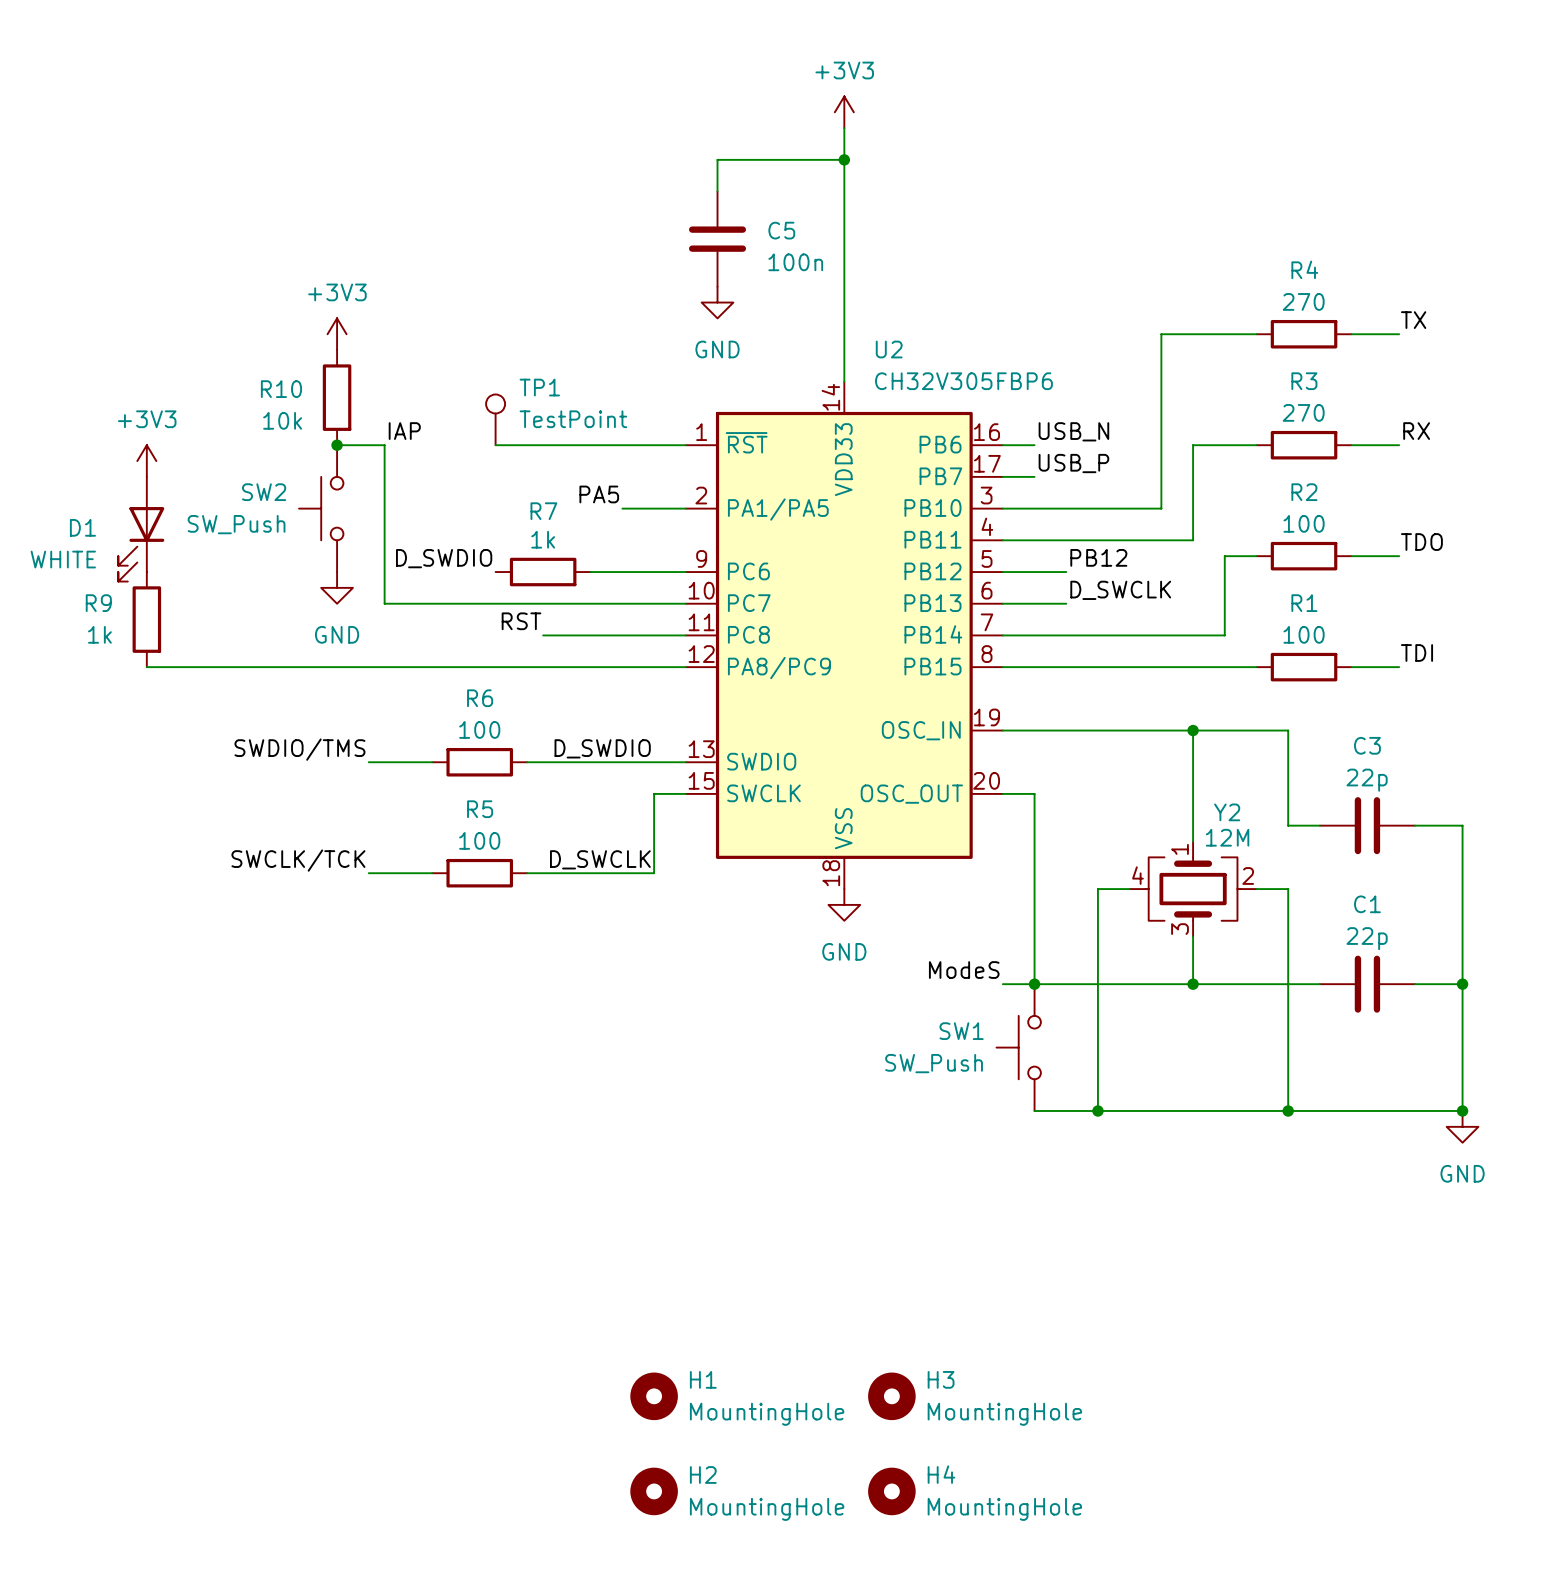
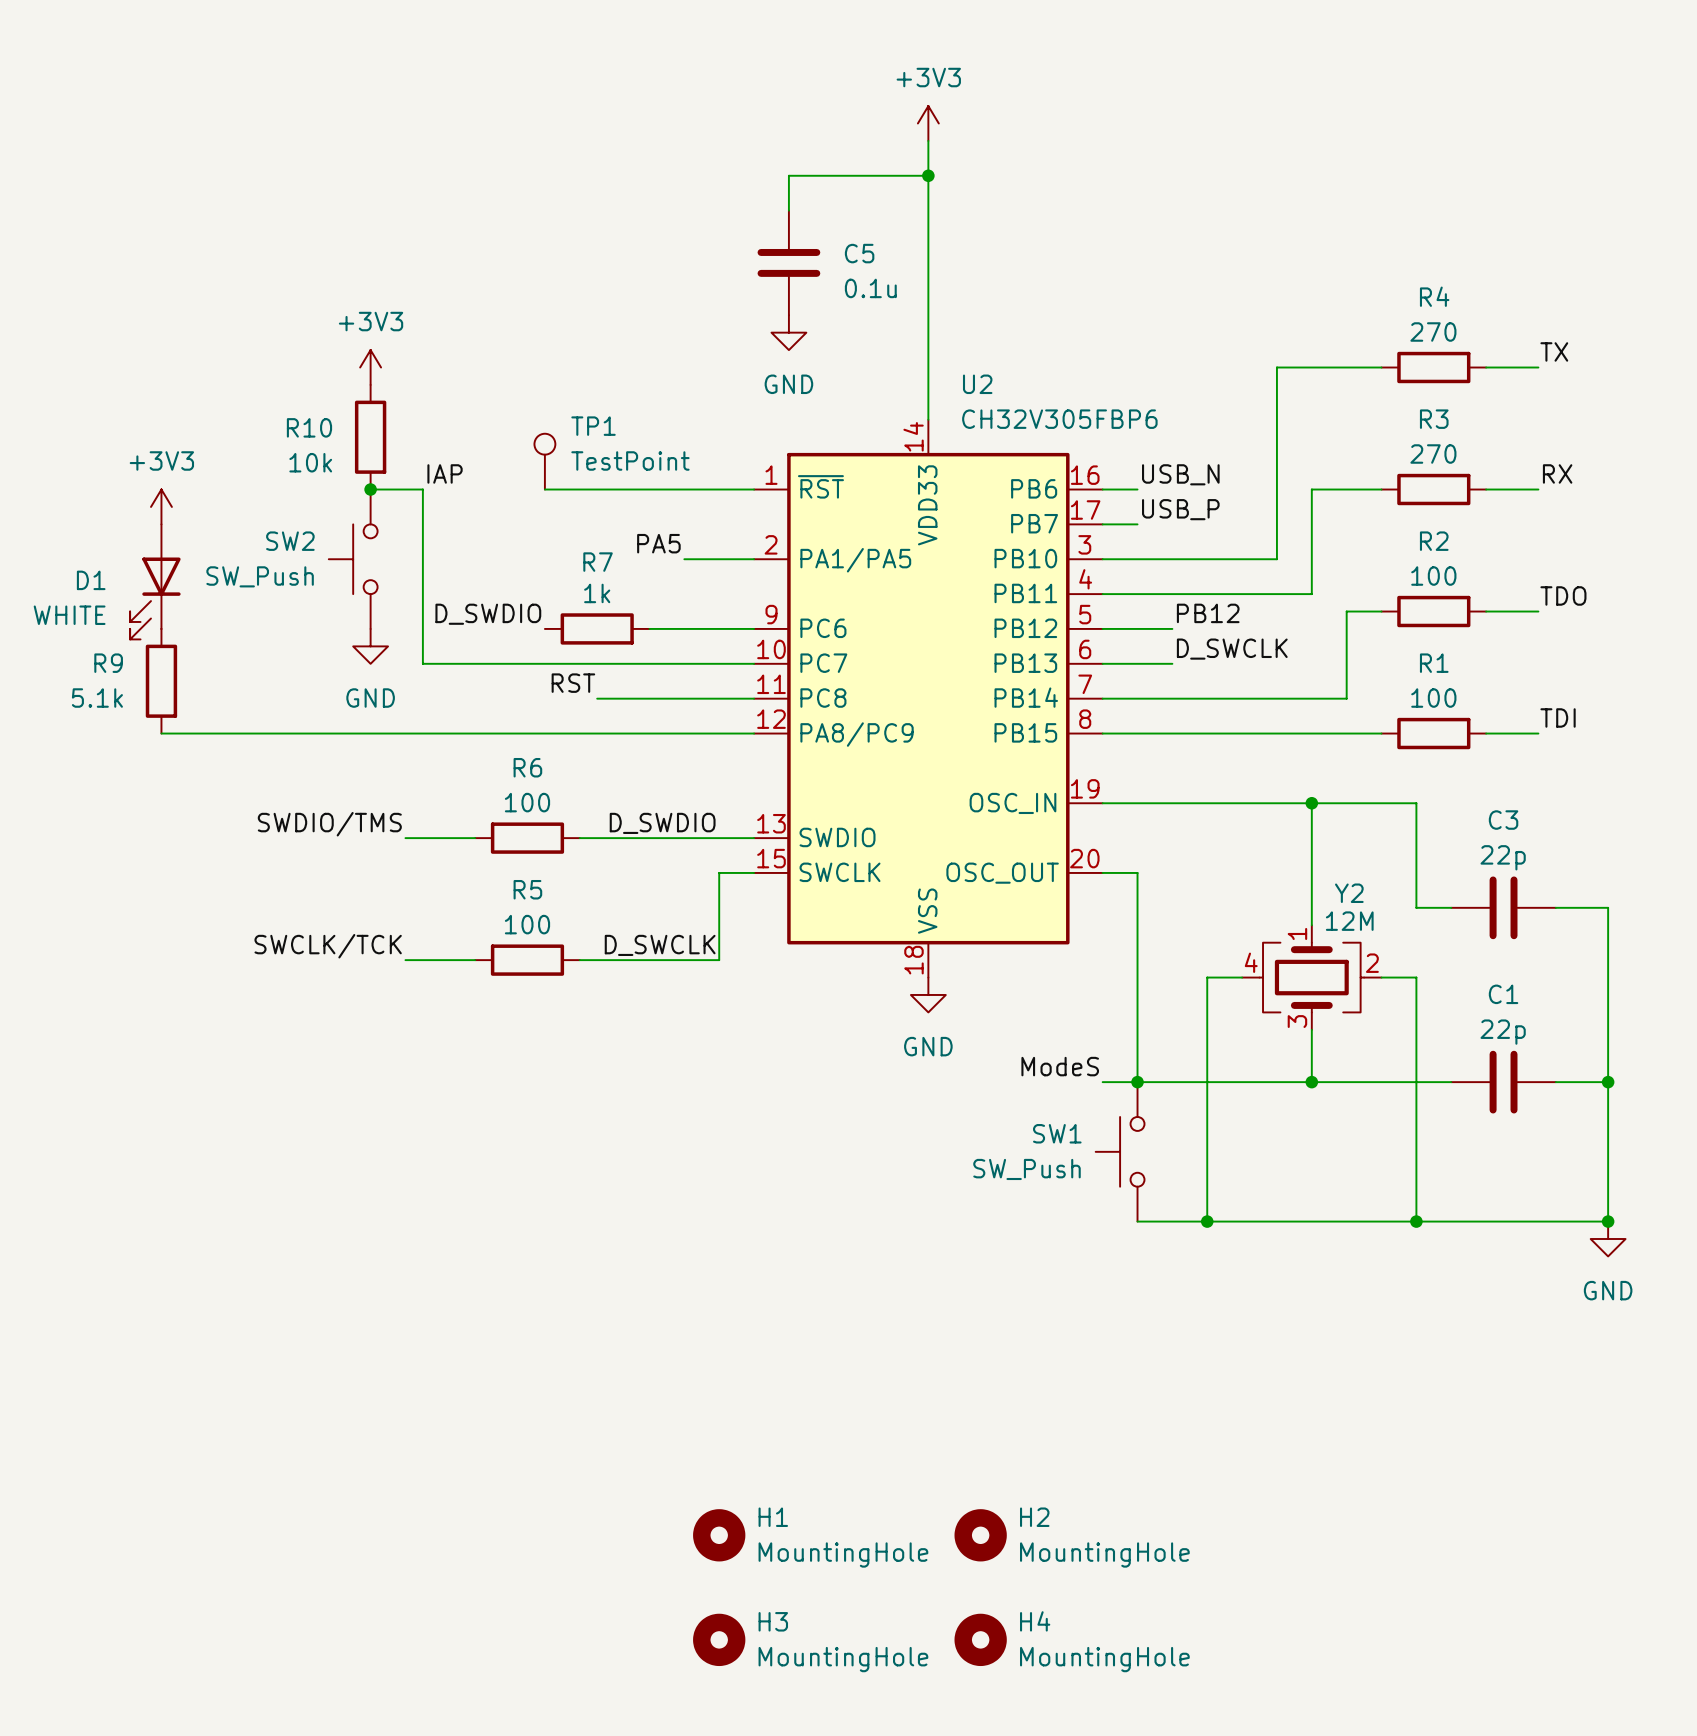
C5 value: 100n (795, 262) -> 0.1u (870, 288)
R9 value: 1k (99, 634) -> 5.1k (97, 698)
H3 name: H3 (941, 1379) -> H2 (1034, 1517)
H2 name: H2 (703, 1474) -> H3 (773, 1621)

